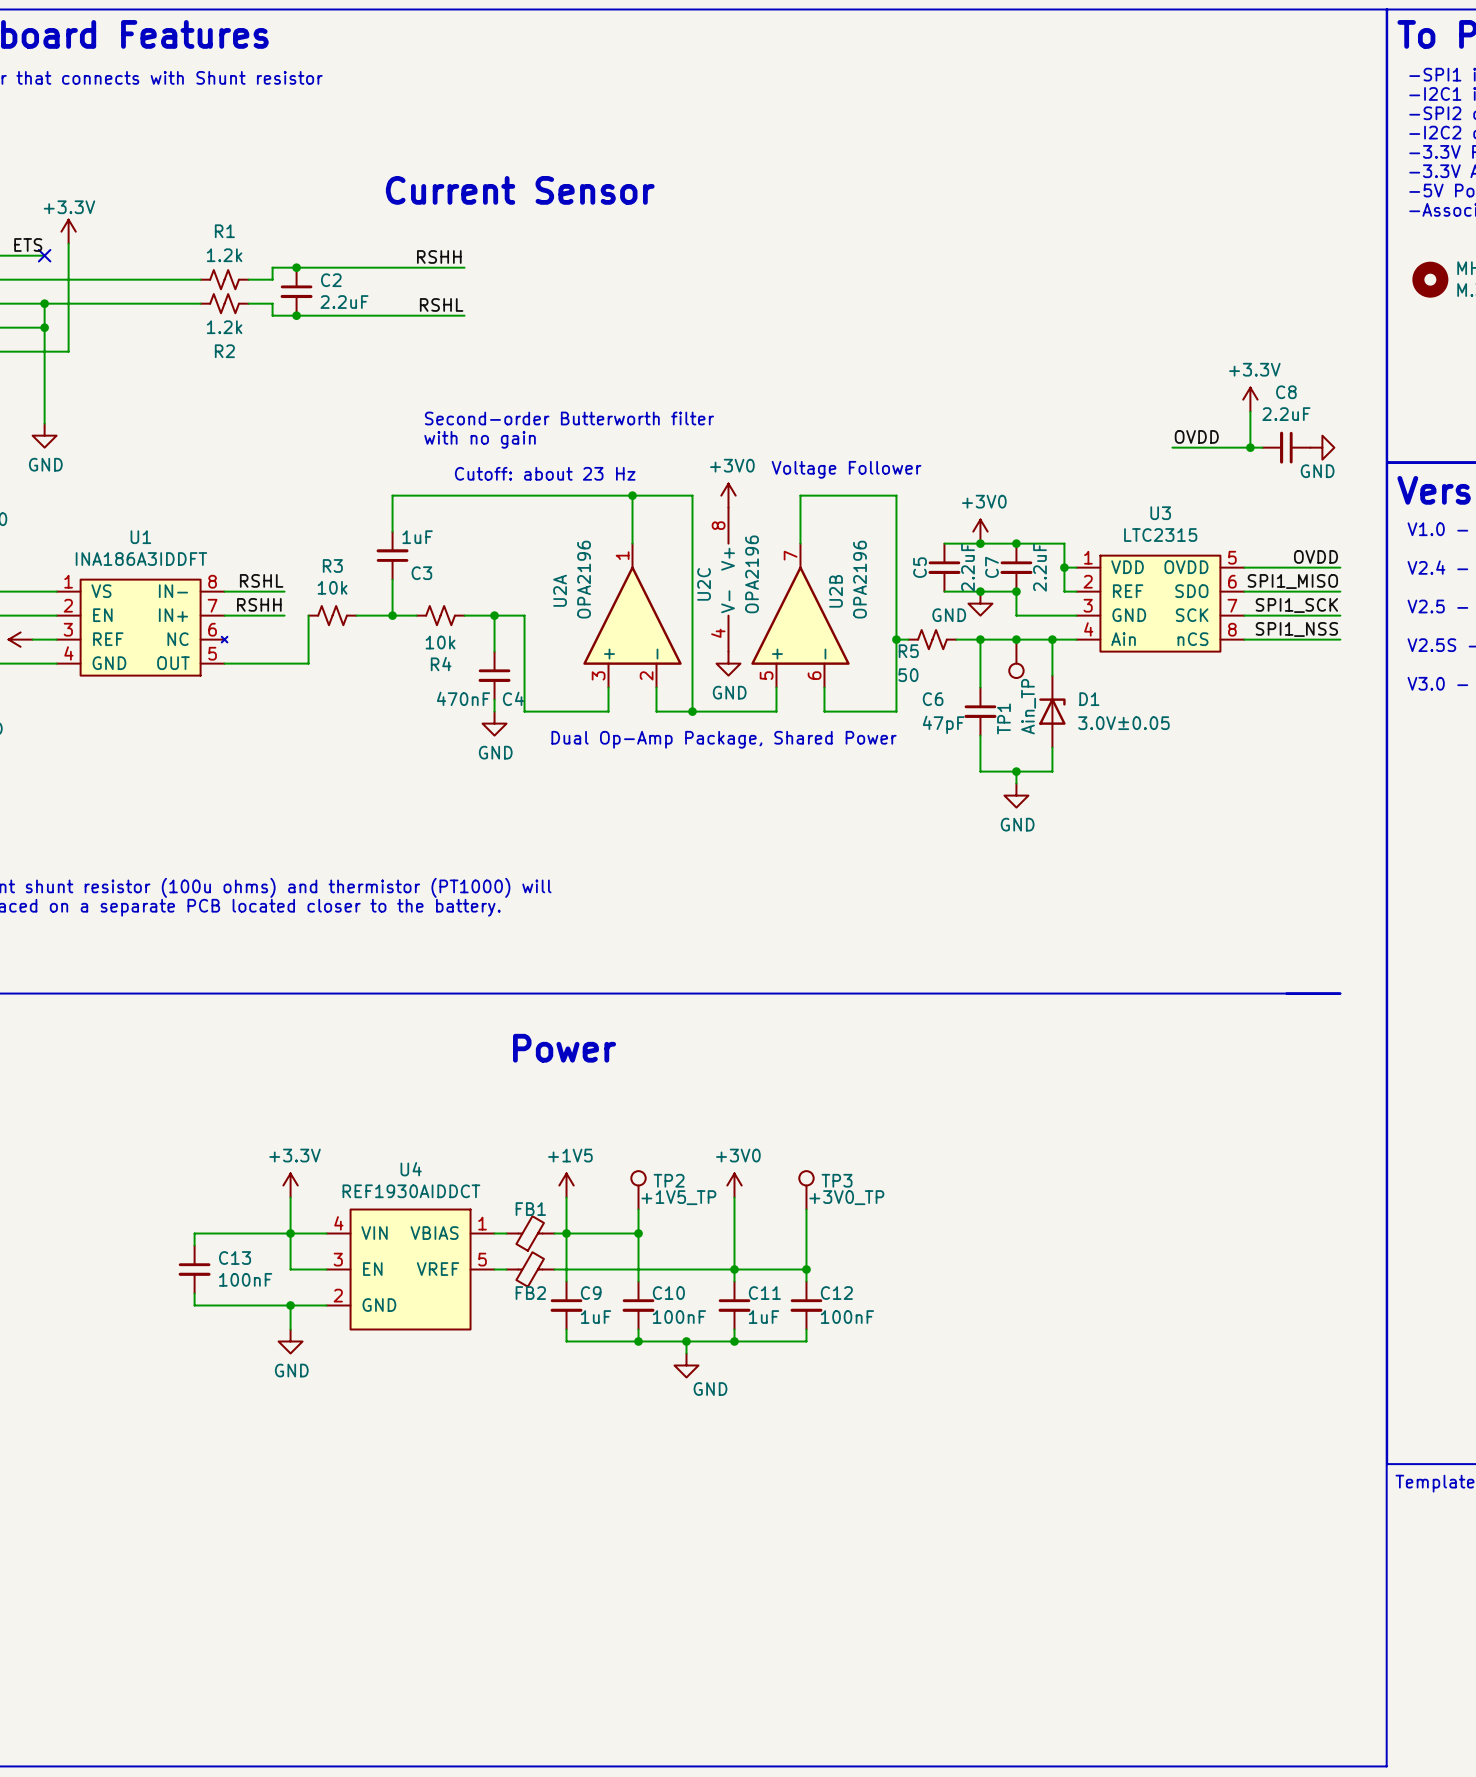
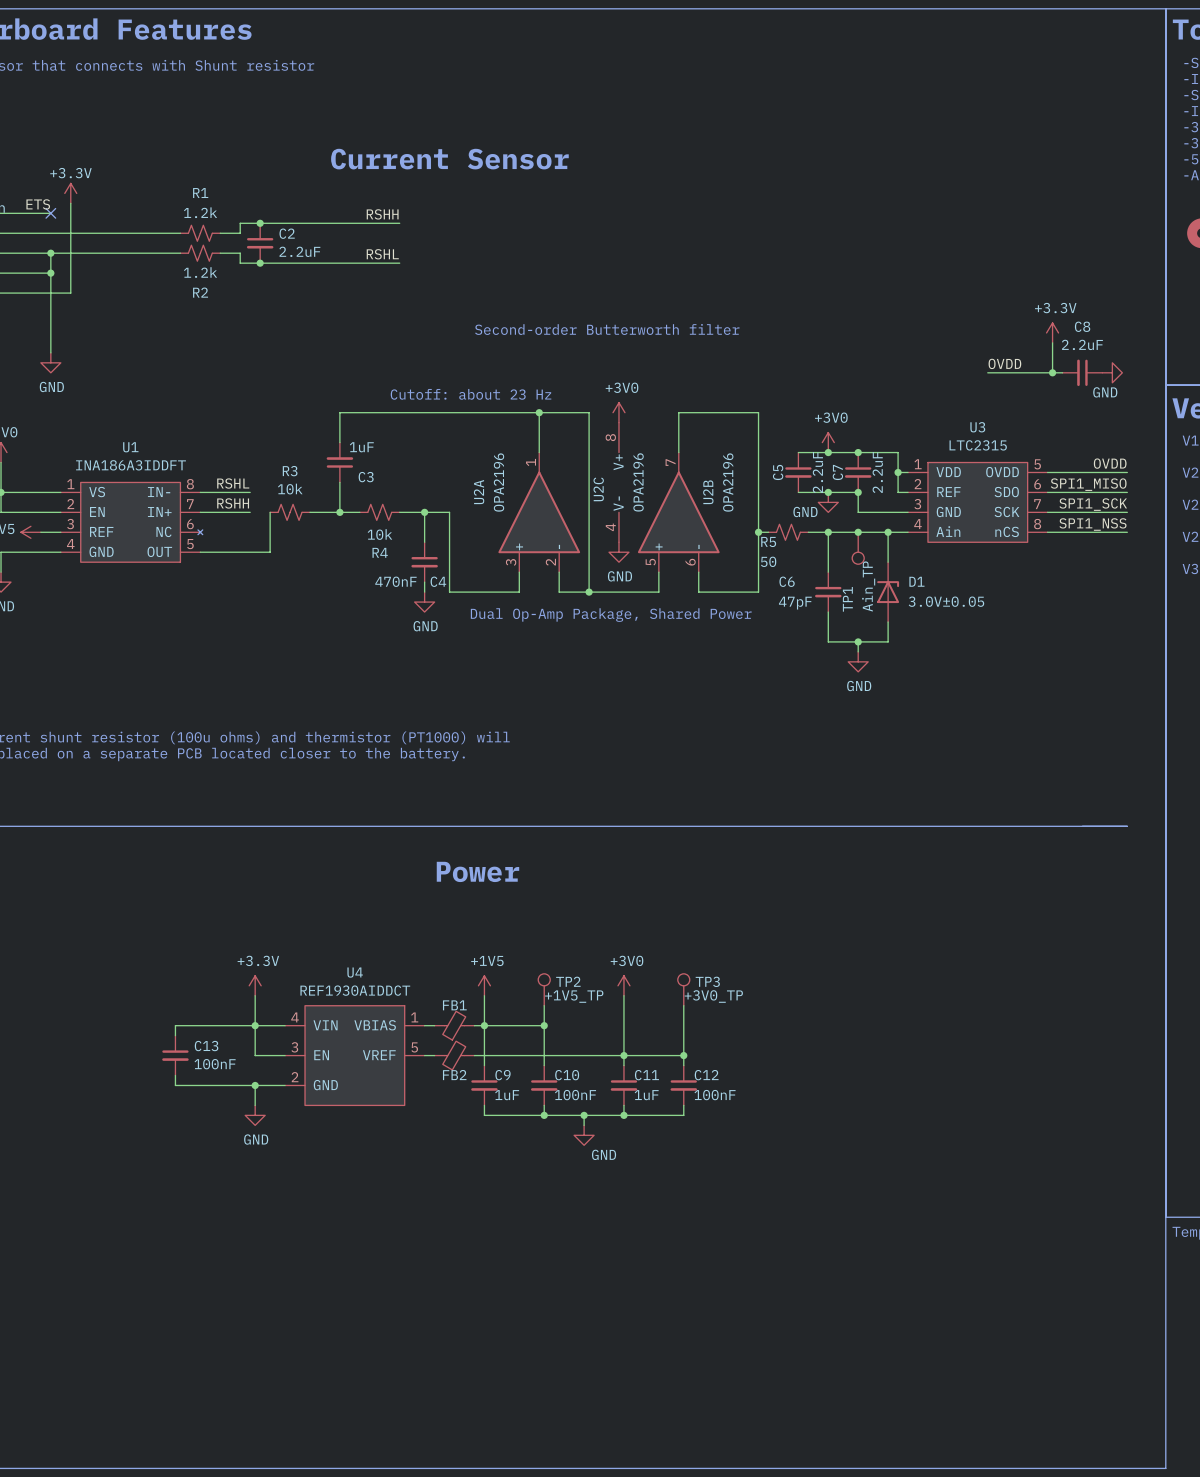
text position: Second-order Butterworth filter (569, 418) -> Second-order Butterworth filter (607, 329)
text: with no gain (480, 439) -> none
text: Voltage Follower (846, 469) -> none

